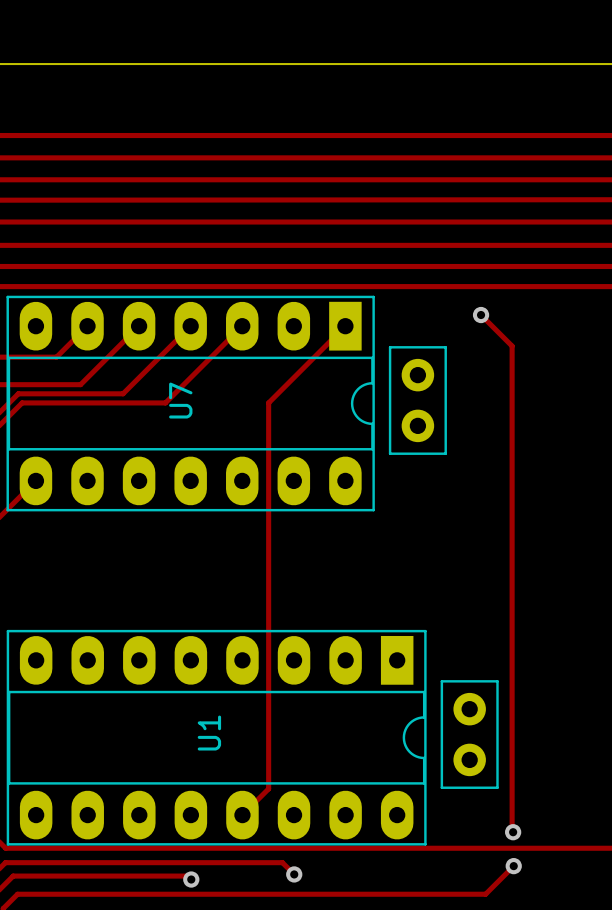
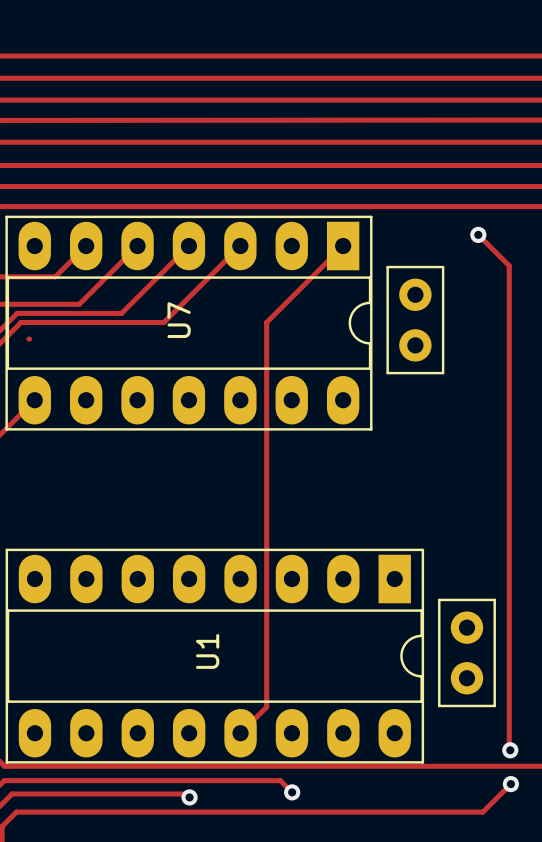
track: none -> (28, 339) (29, 339)

